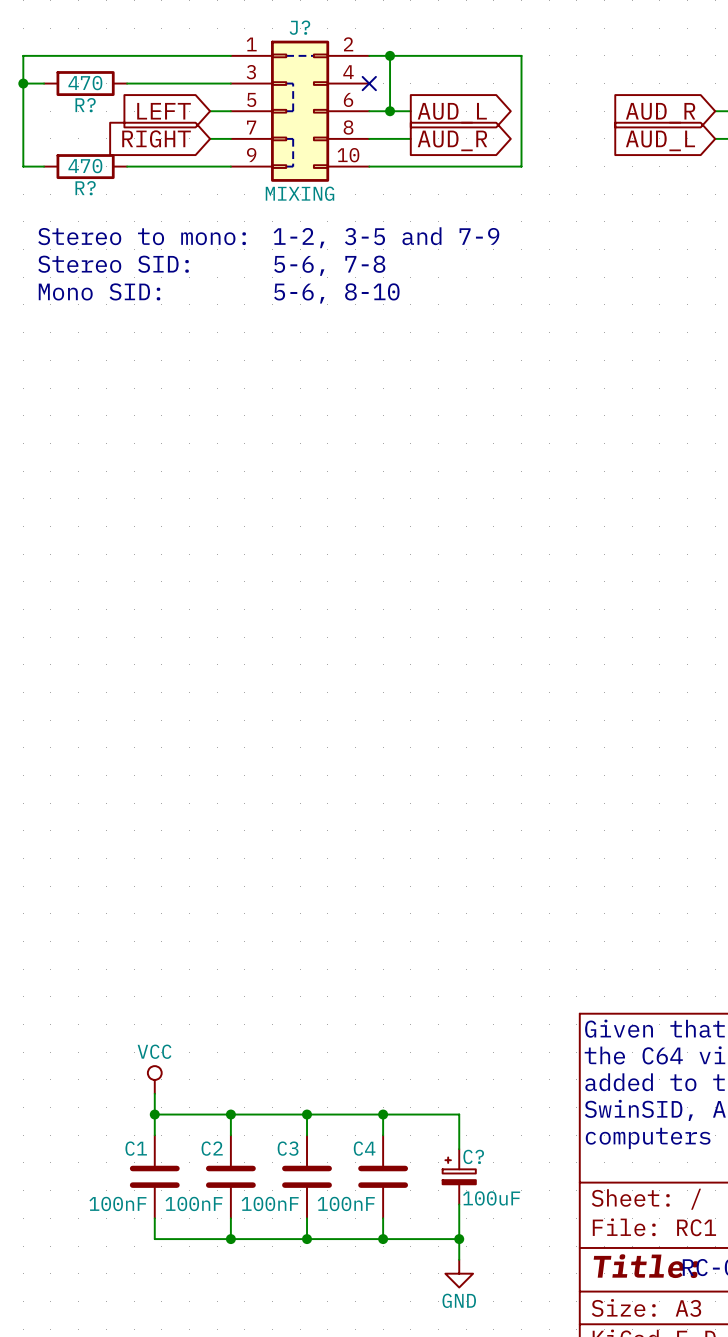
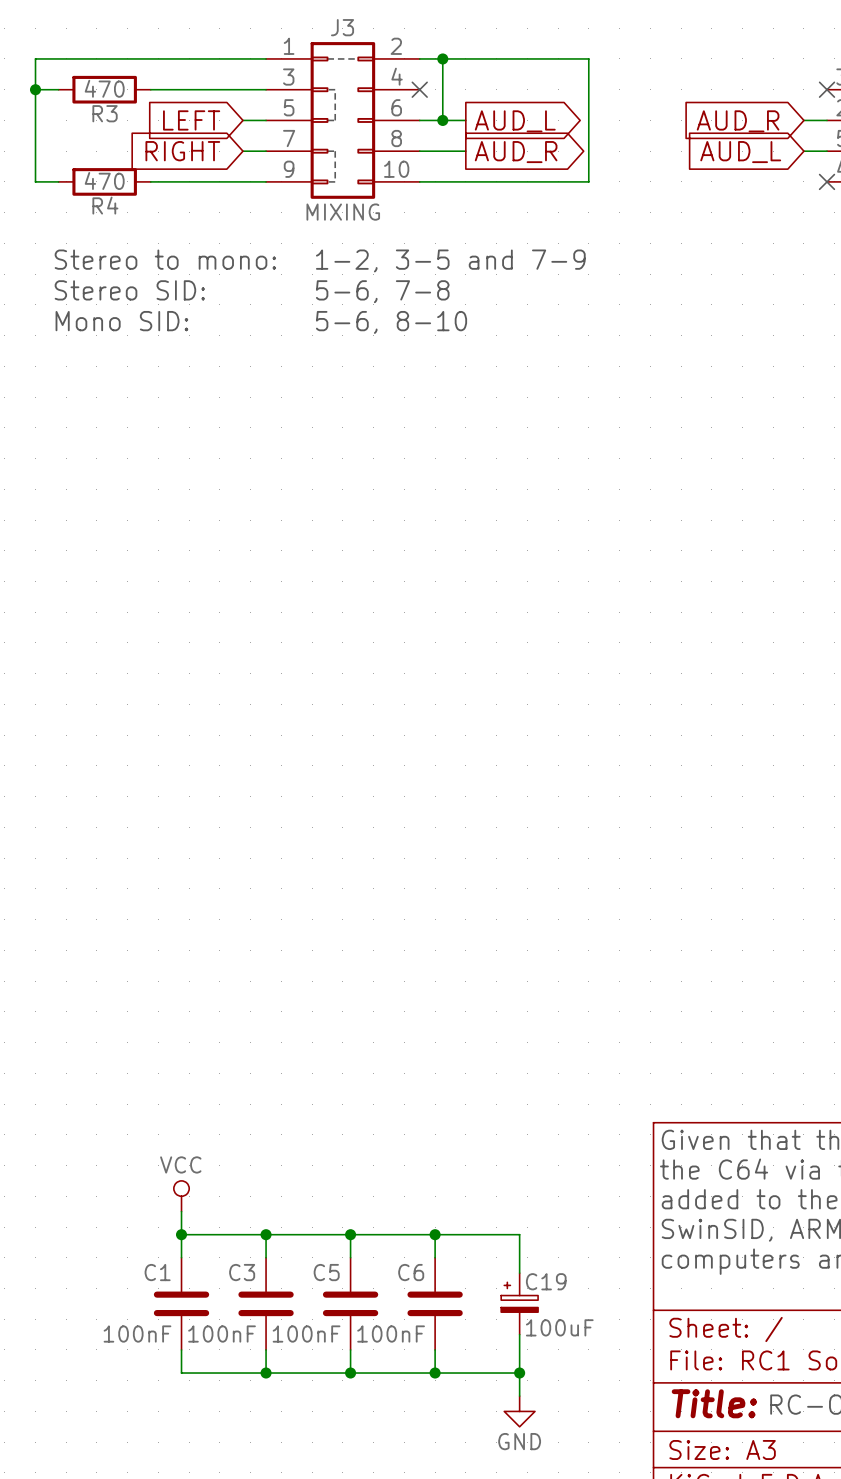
J? name: J? (299, 27) -> J3 (342, 27)
R? name: R? (85, 105) -> R3 (105, 113)
R? name: R? (85, 188) -> R4 (105, 205)
C2 name: C2 (212, 1148) -> C3 (242, 1272)
C3 name: C3 (288, 1148) -> C5 (326, 1272)
C4 name: C4 (364, 1148) -> C6 (411, 1272)
C? name: C? (473, 1156) -> C19 (546, 1281)

